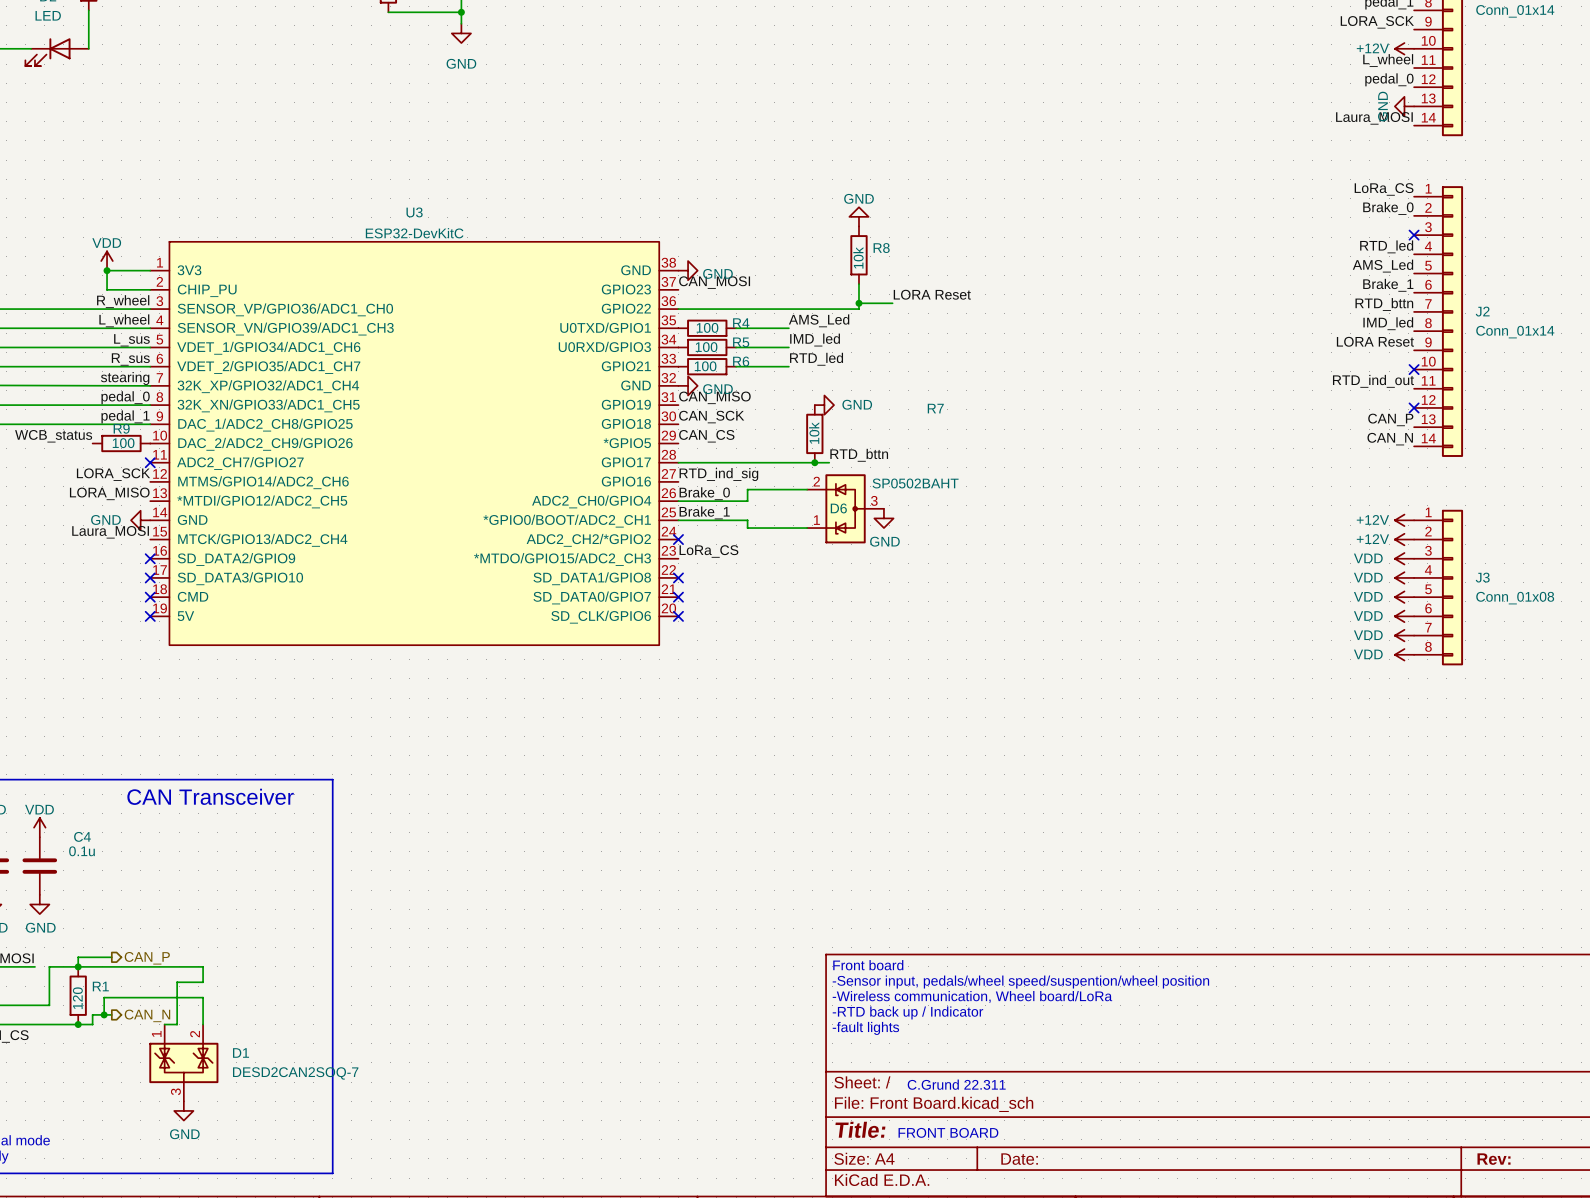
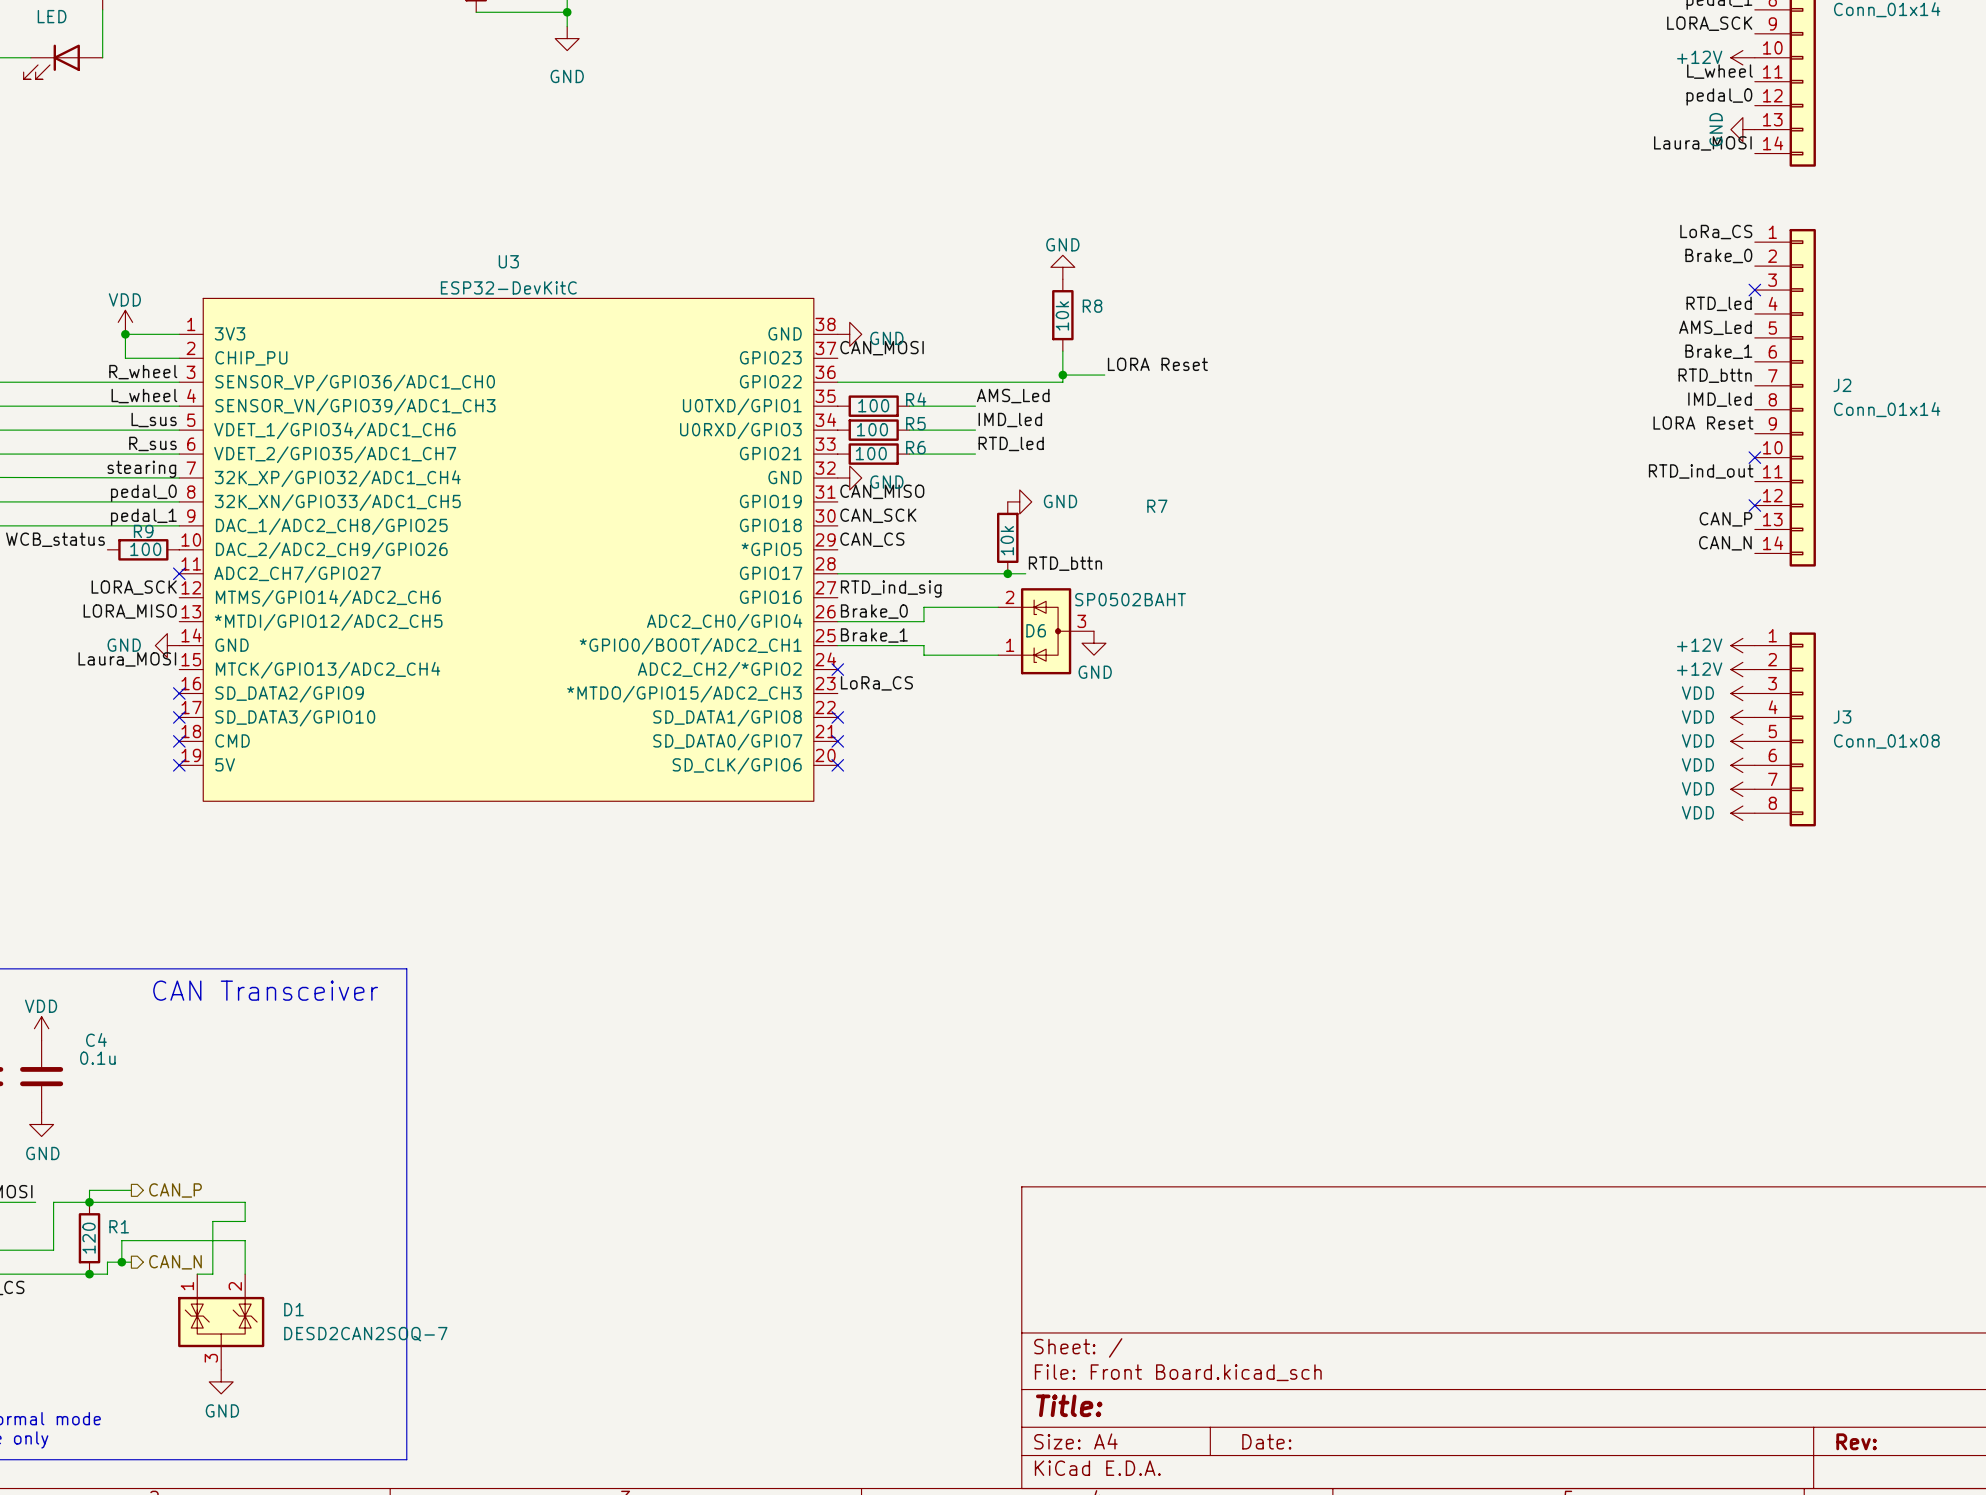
text: Front board (868, 965) -> none
text: -Sensor input, pedals/wheel speed/suspention/wheel position (1020, 982) -> none
text: -Wireless communication, Wheel board/LoRa (972, 996) -> none
text: -RTD back up / Indicator (907, 1012) -> none
text: -fault lights (865, 1028) -> none
text: C.Grund 22.311 (956, 1084) -> none
text: FRONT BOARD (948, 1132) -> none

